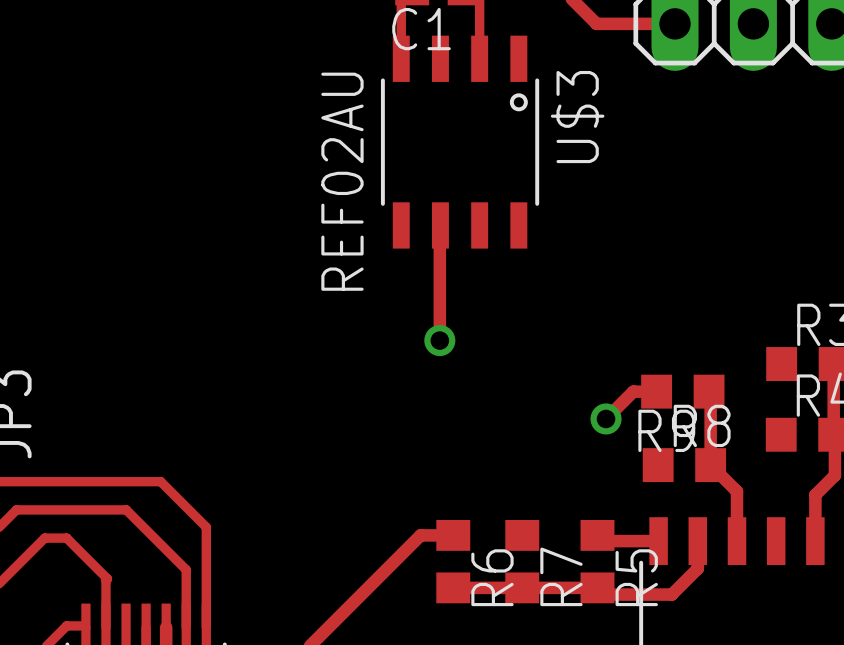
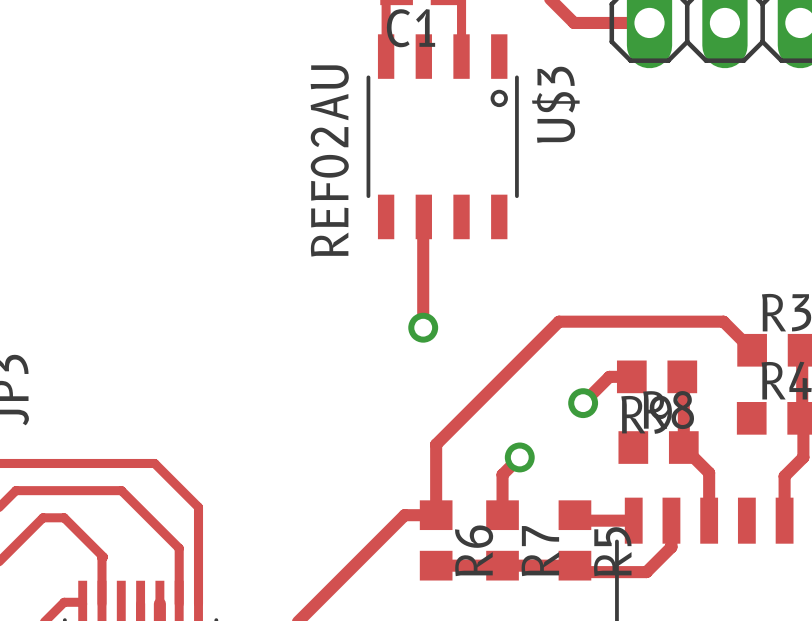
track: none -> (752, 350) (723, 321) (558, 321) (436, 444) (436, 515)
track: none -> (519, 457) (502, 474) (502, 515)
via: none -> (519, 457)

